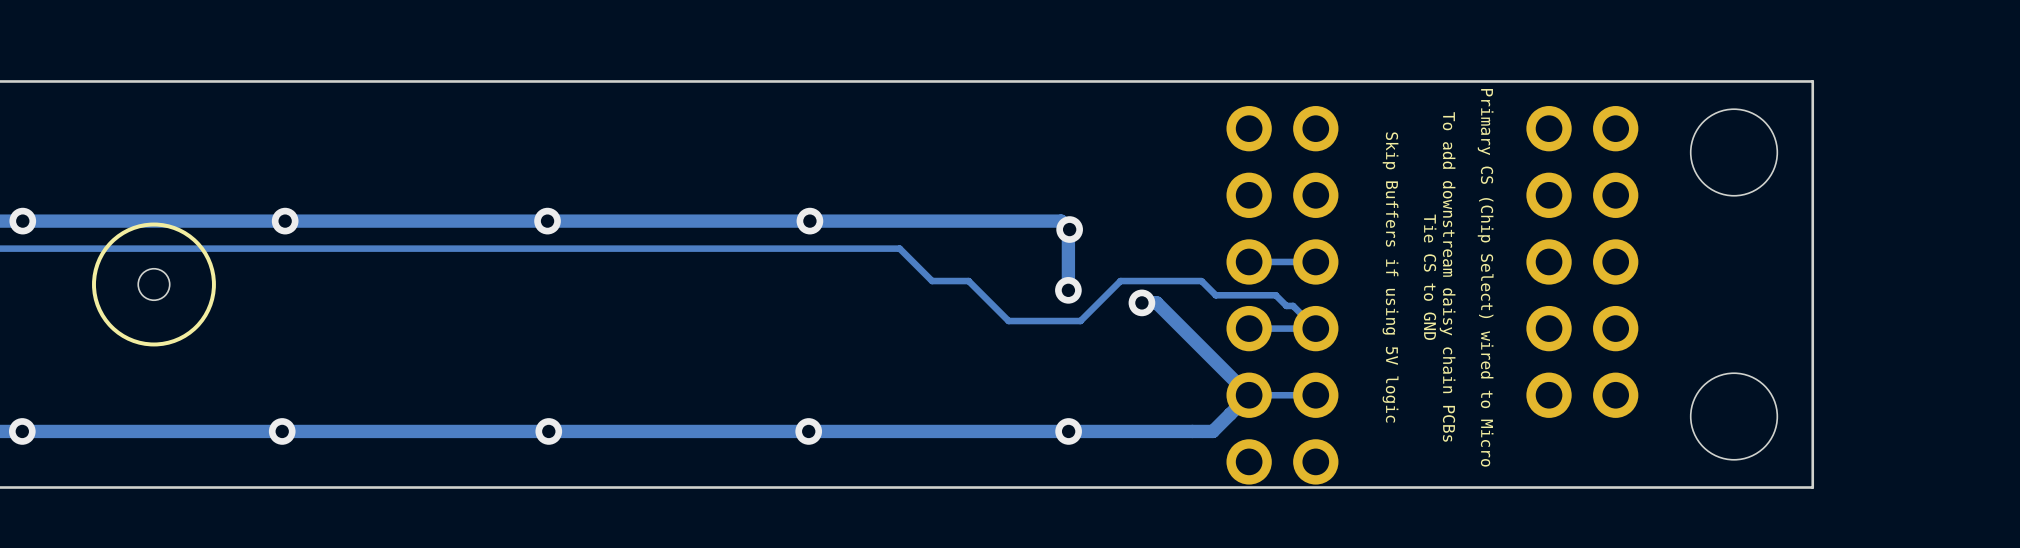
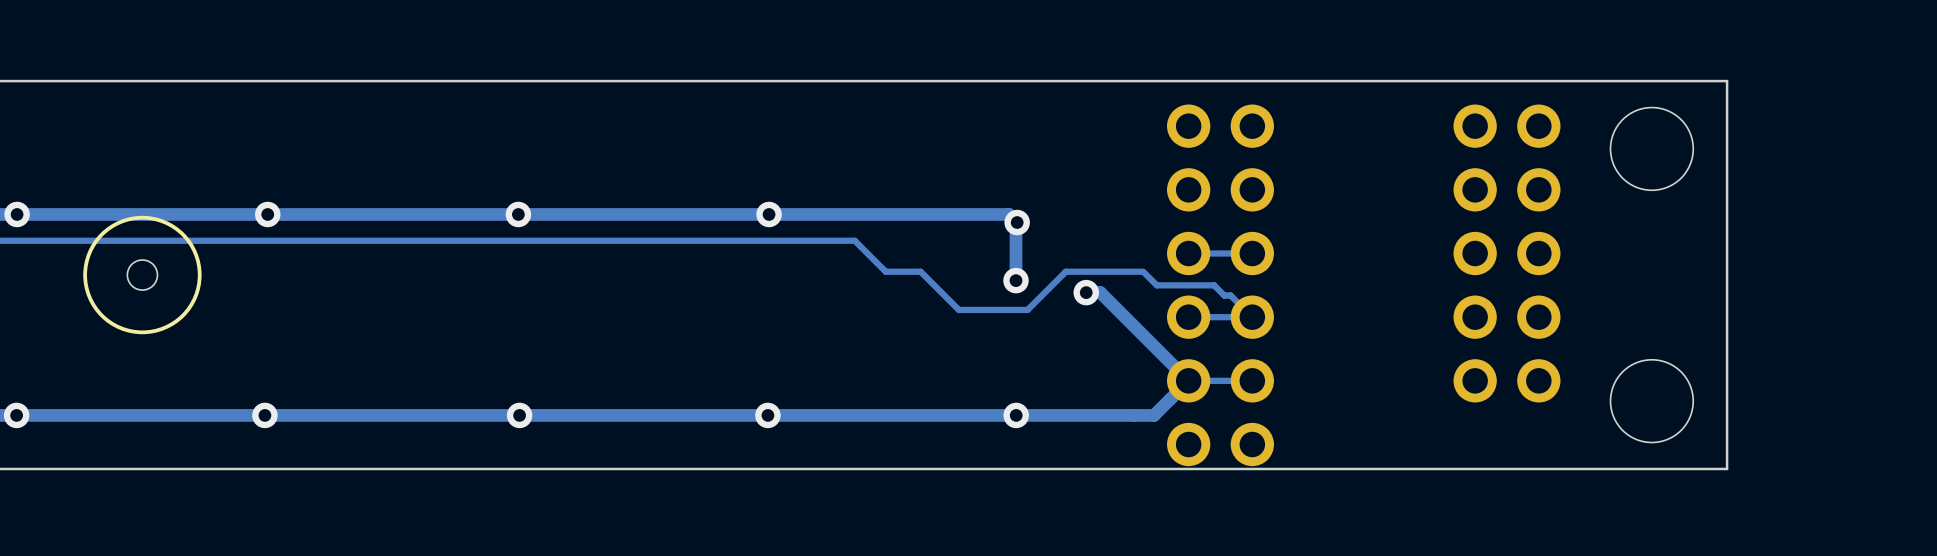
text: To add downstream daisy chain PCBs (1447, 276) -> none
text: Skip Buffers if using 5V logic (1390, 277) -> none
text: Tie CS to GND (1430, 277) -> none
text: Primary CS (Chip Select) wired to Micro (1485, 277) -> none

